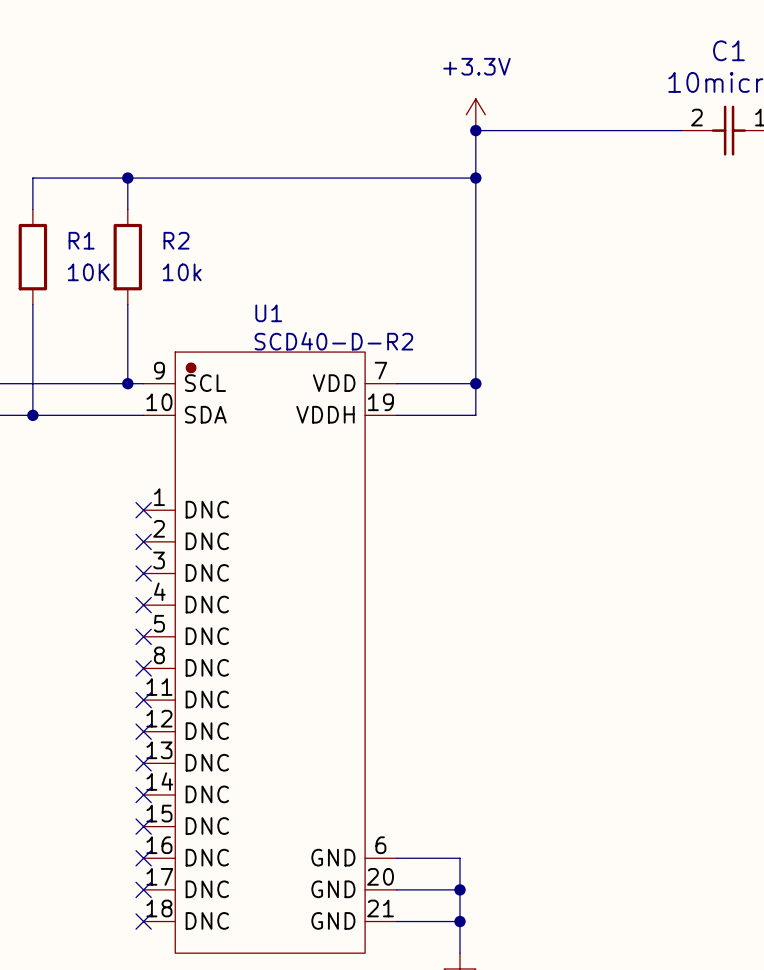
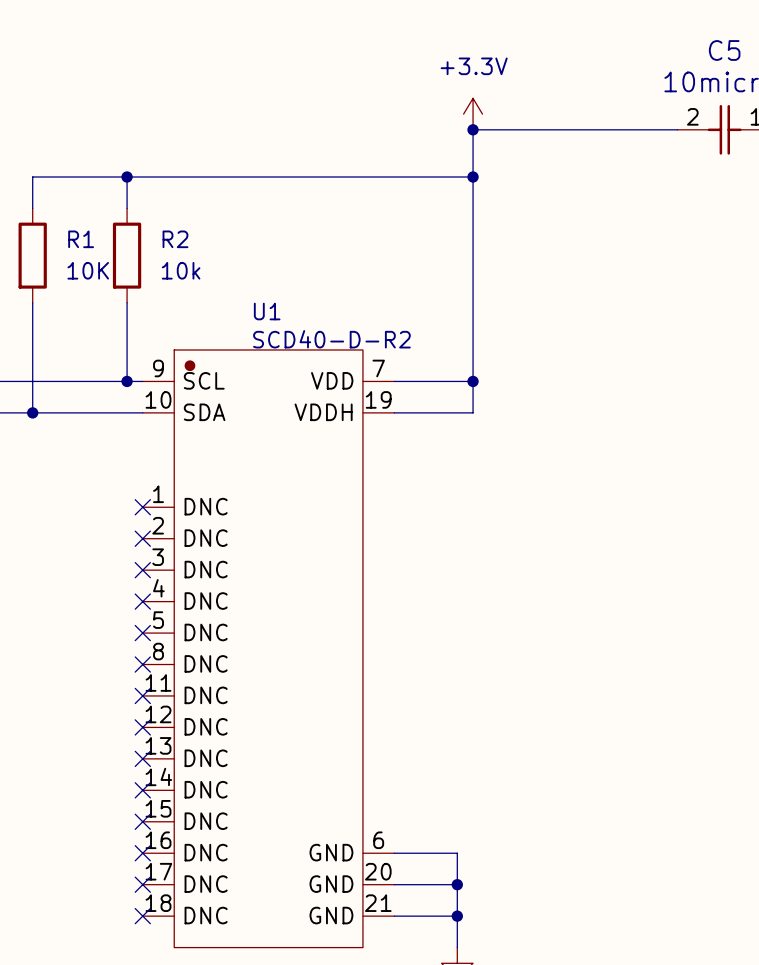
C1 name: C1 (728, 50) -> C5 (724, 50)

